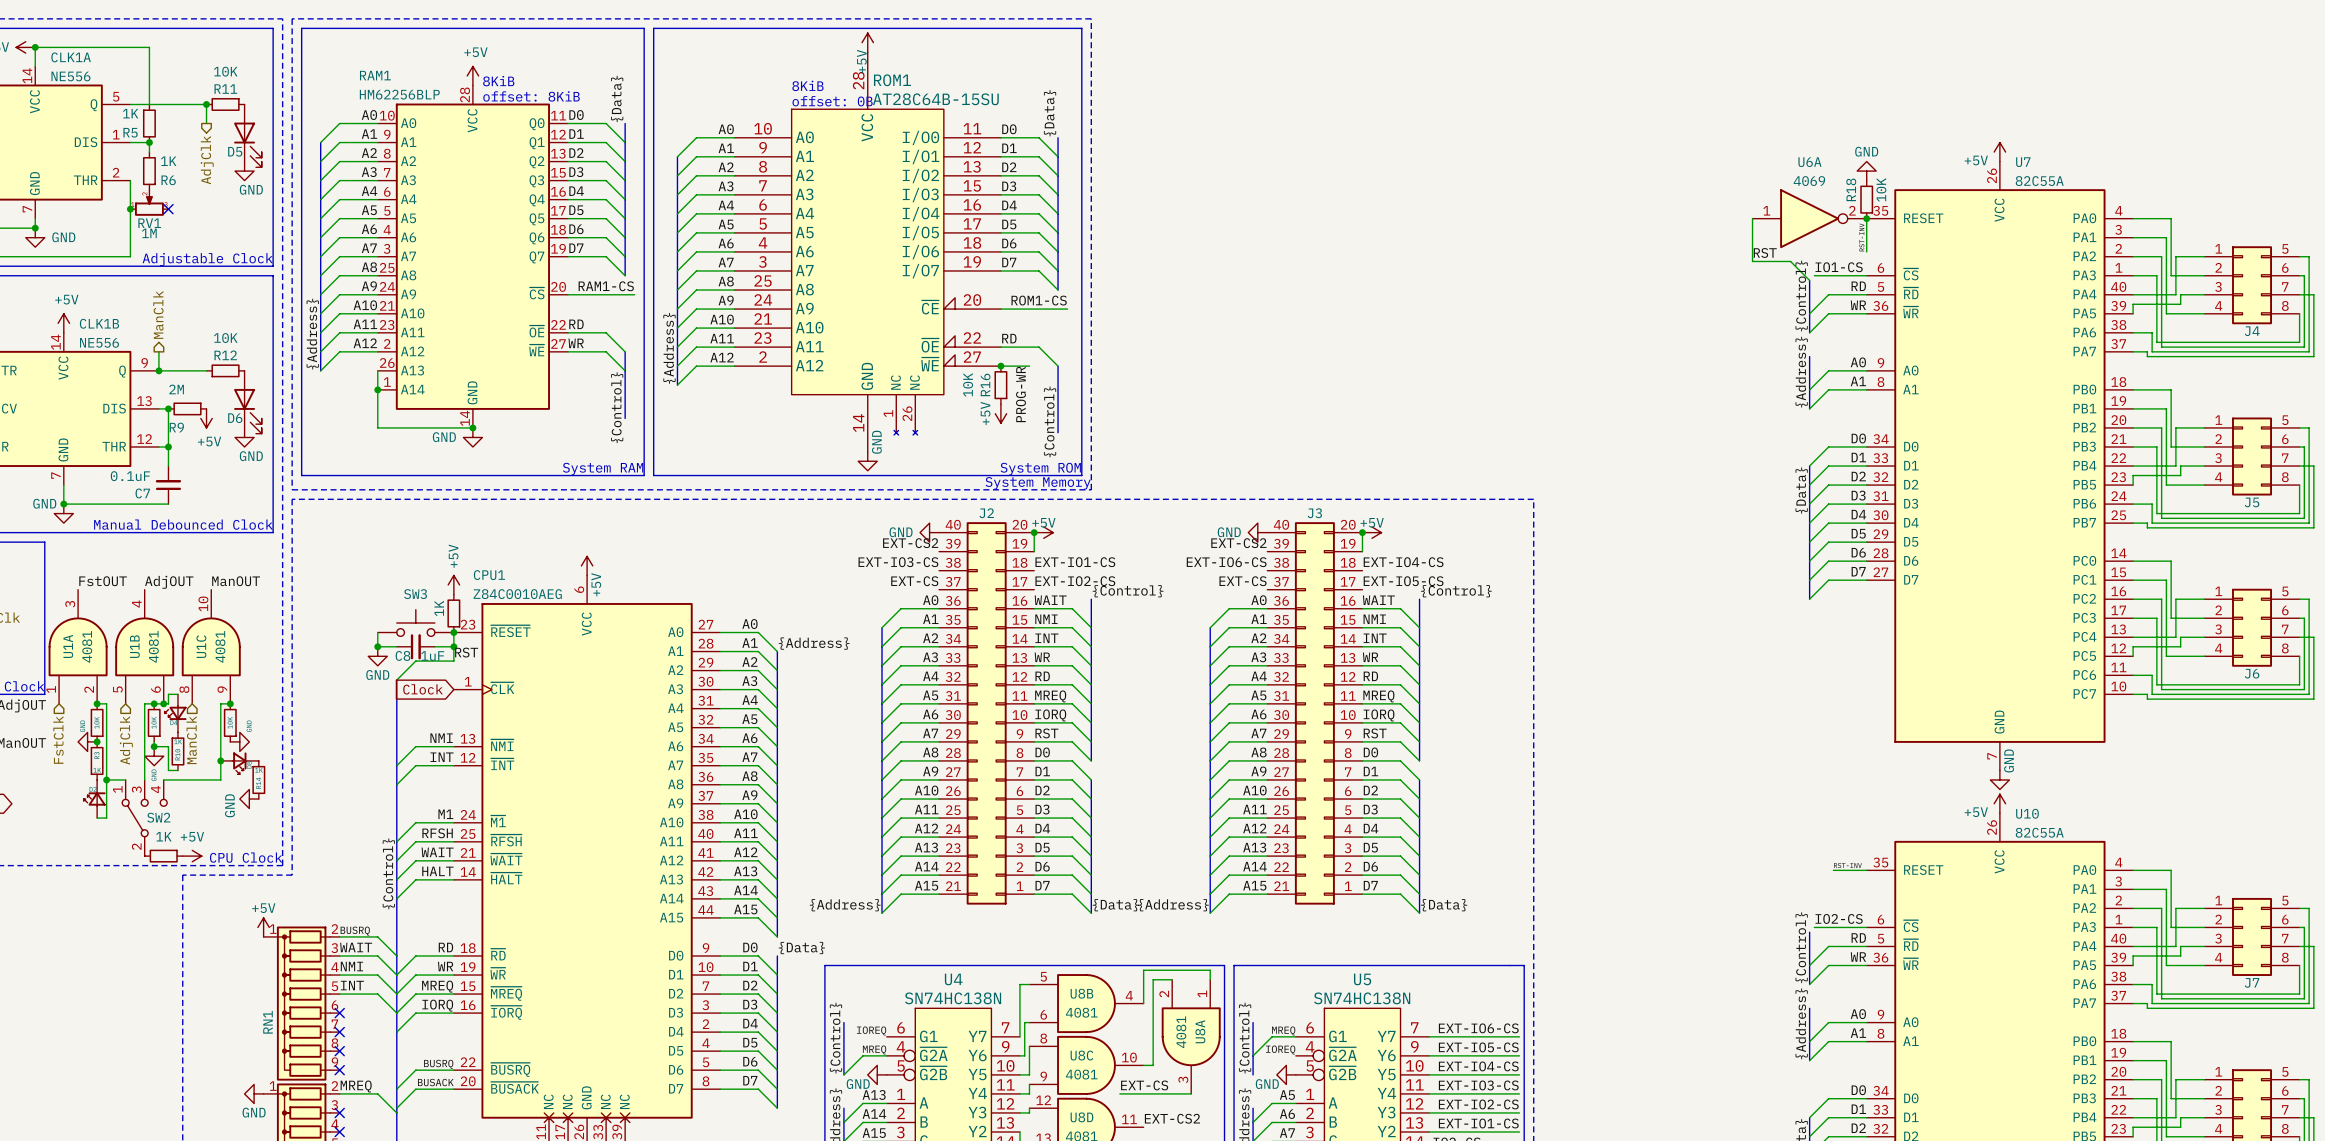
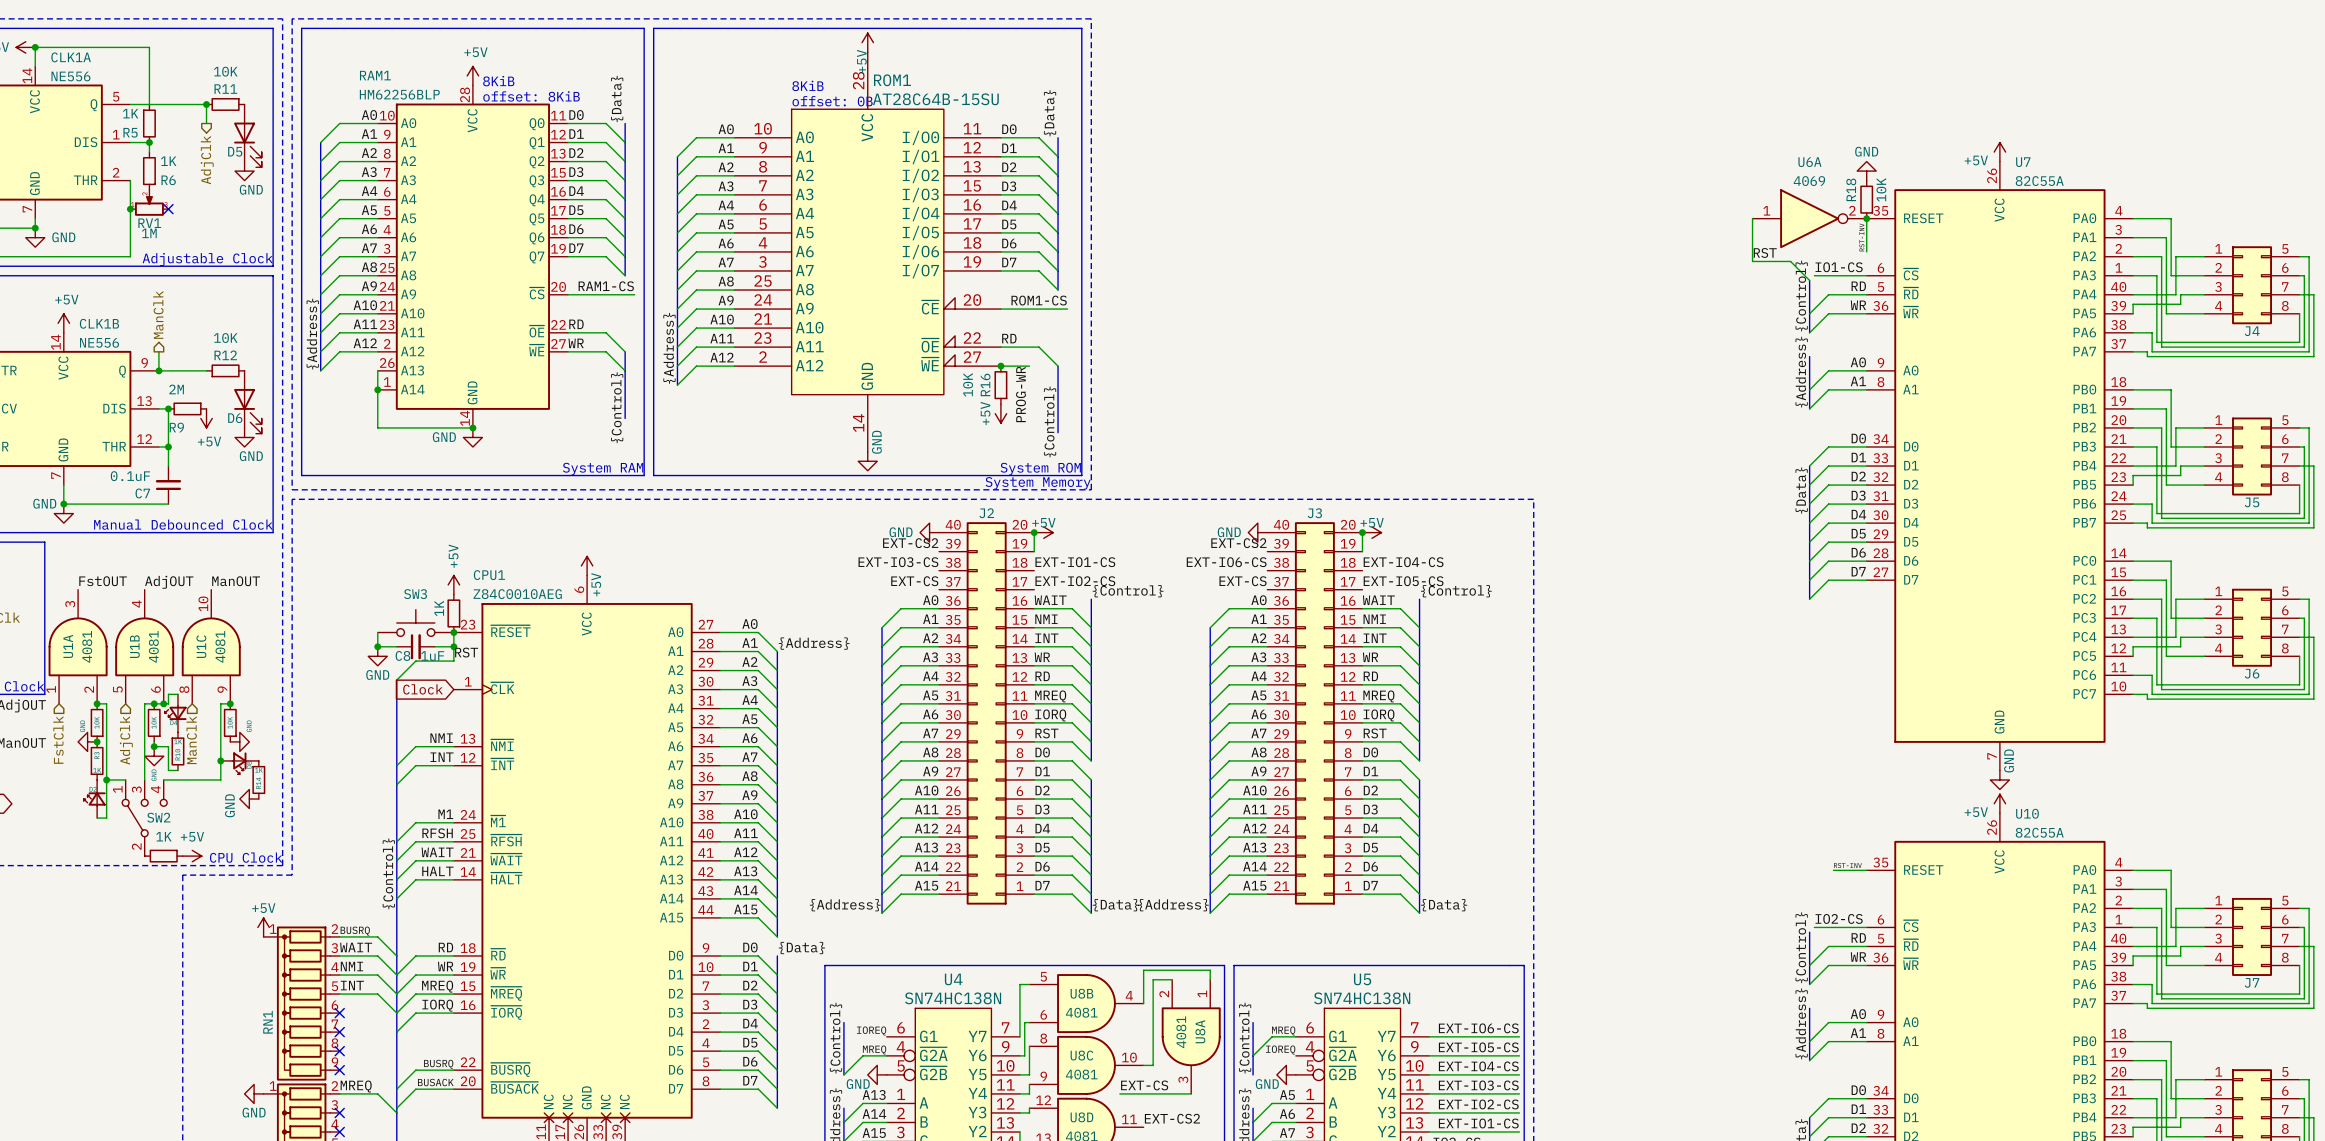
ROM1 symbol: [734, 52, 1001, 452] -> [734, 52, 1001, 452]

